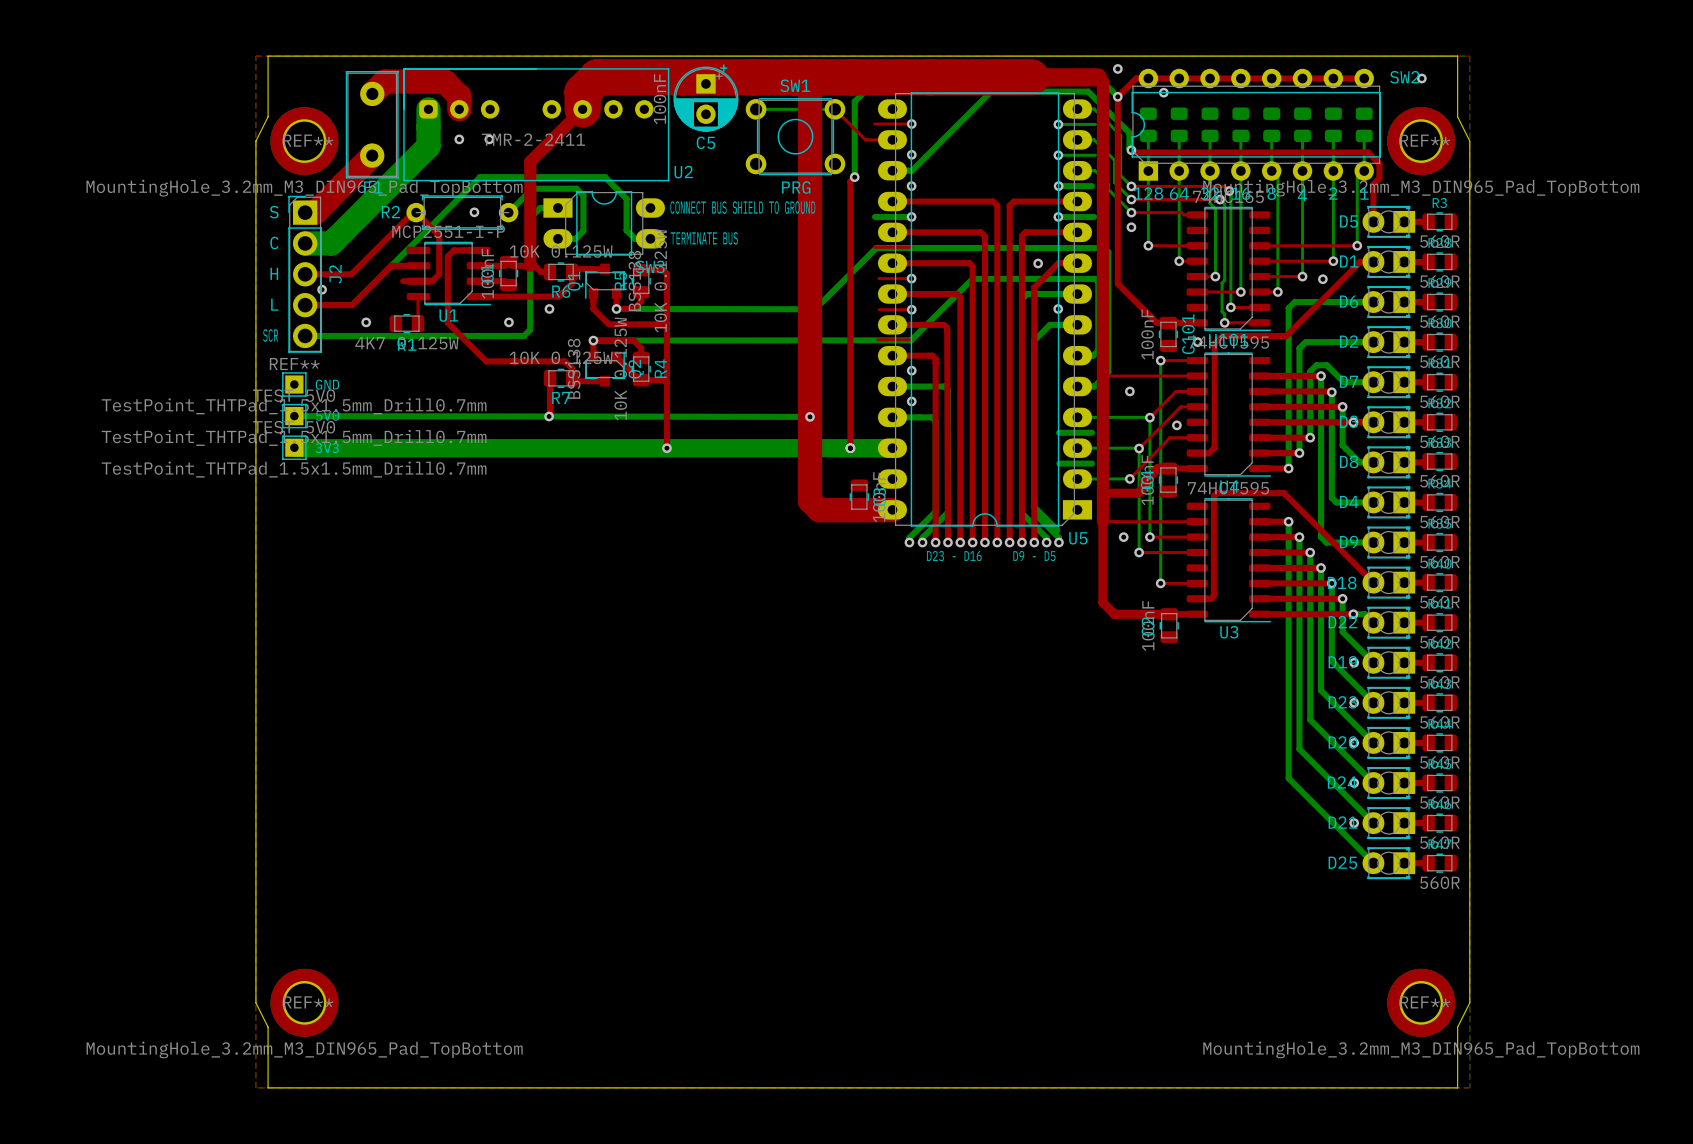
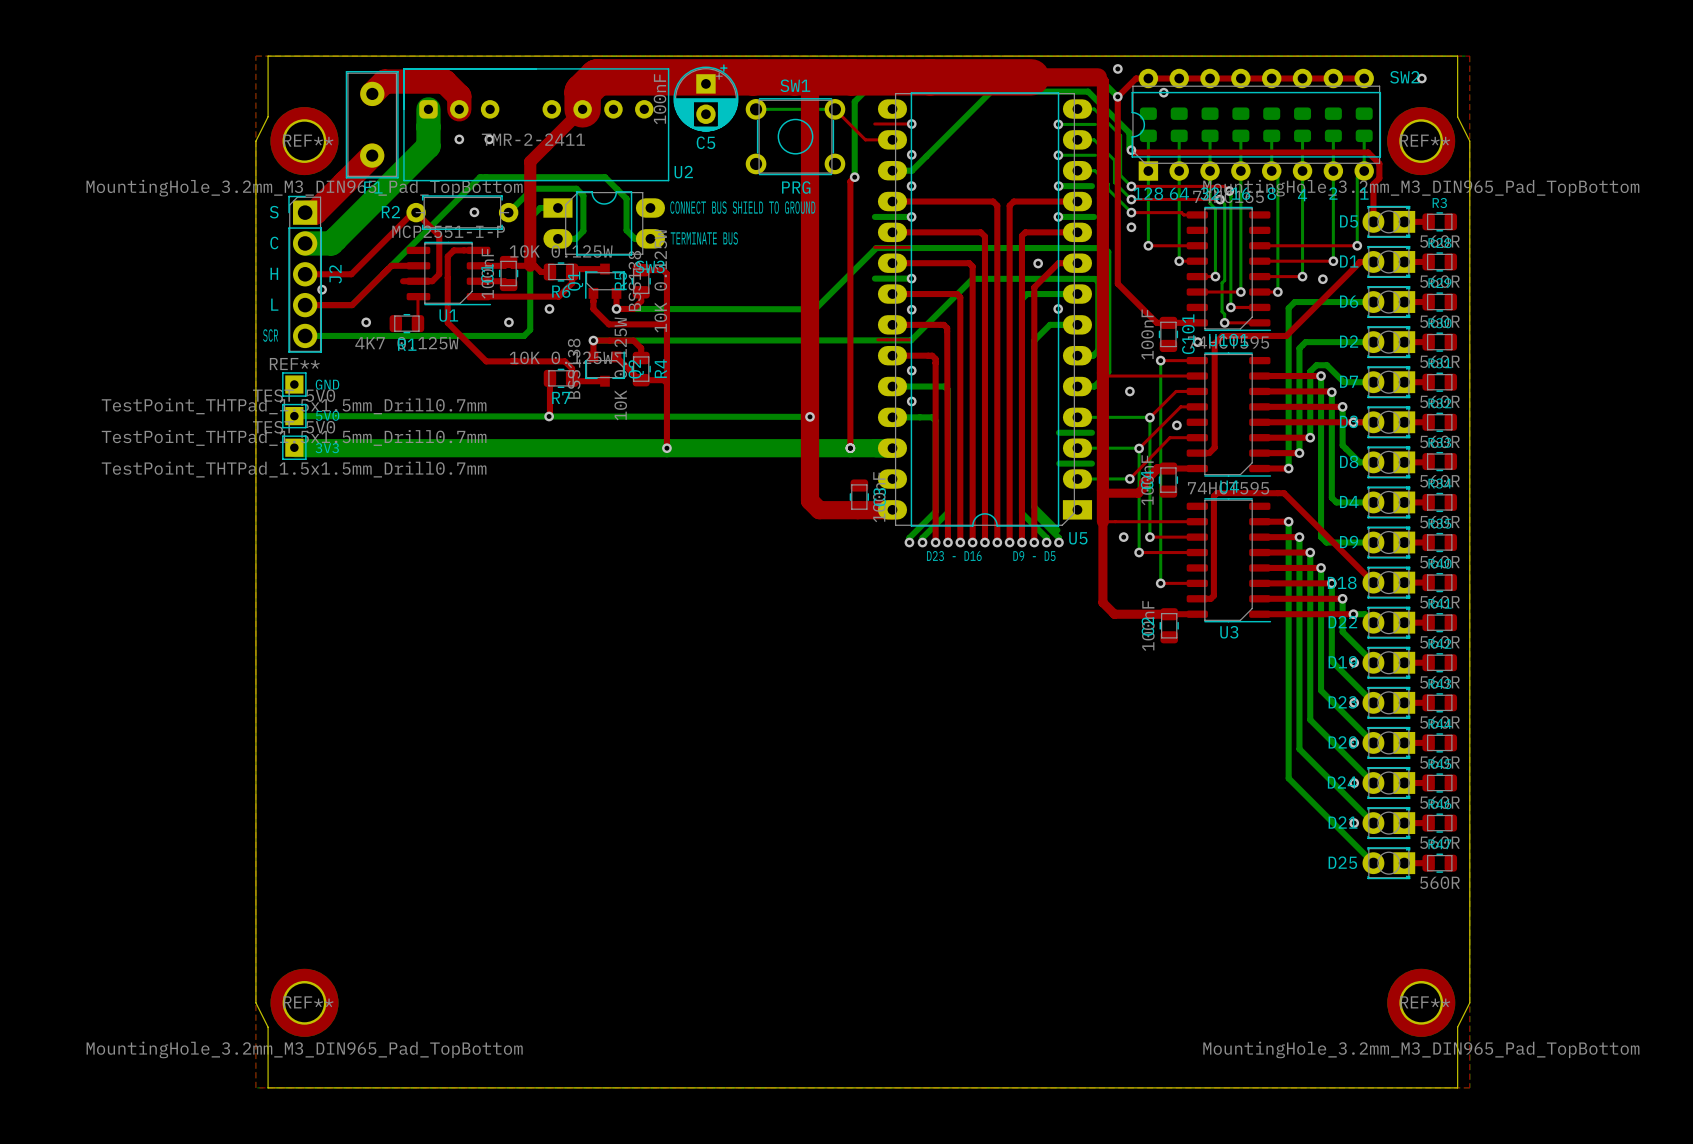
top track width: thick (810, 81) (810, 500) (819, 510) (892, 510) -> thin (810, 81) (810, 500) (819, 510) (892, 510)
bottom track: none -> (874, 278) (909, 278)
top track: (878, 278) (911, 278) -> none
top track: (879, 309) (911, 309) -> none

